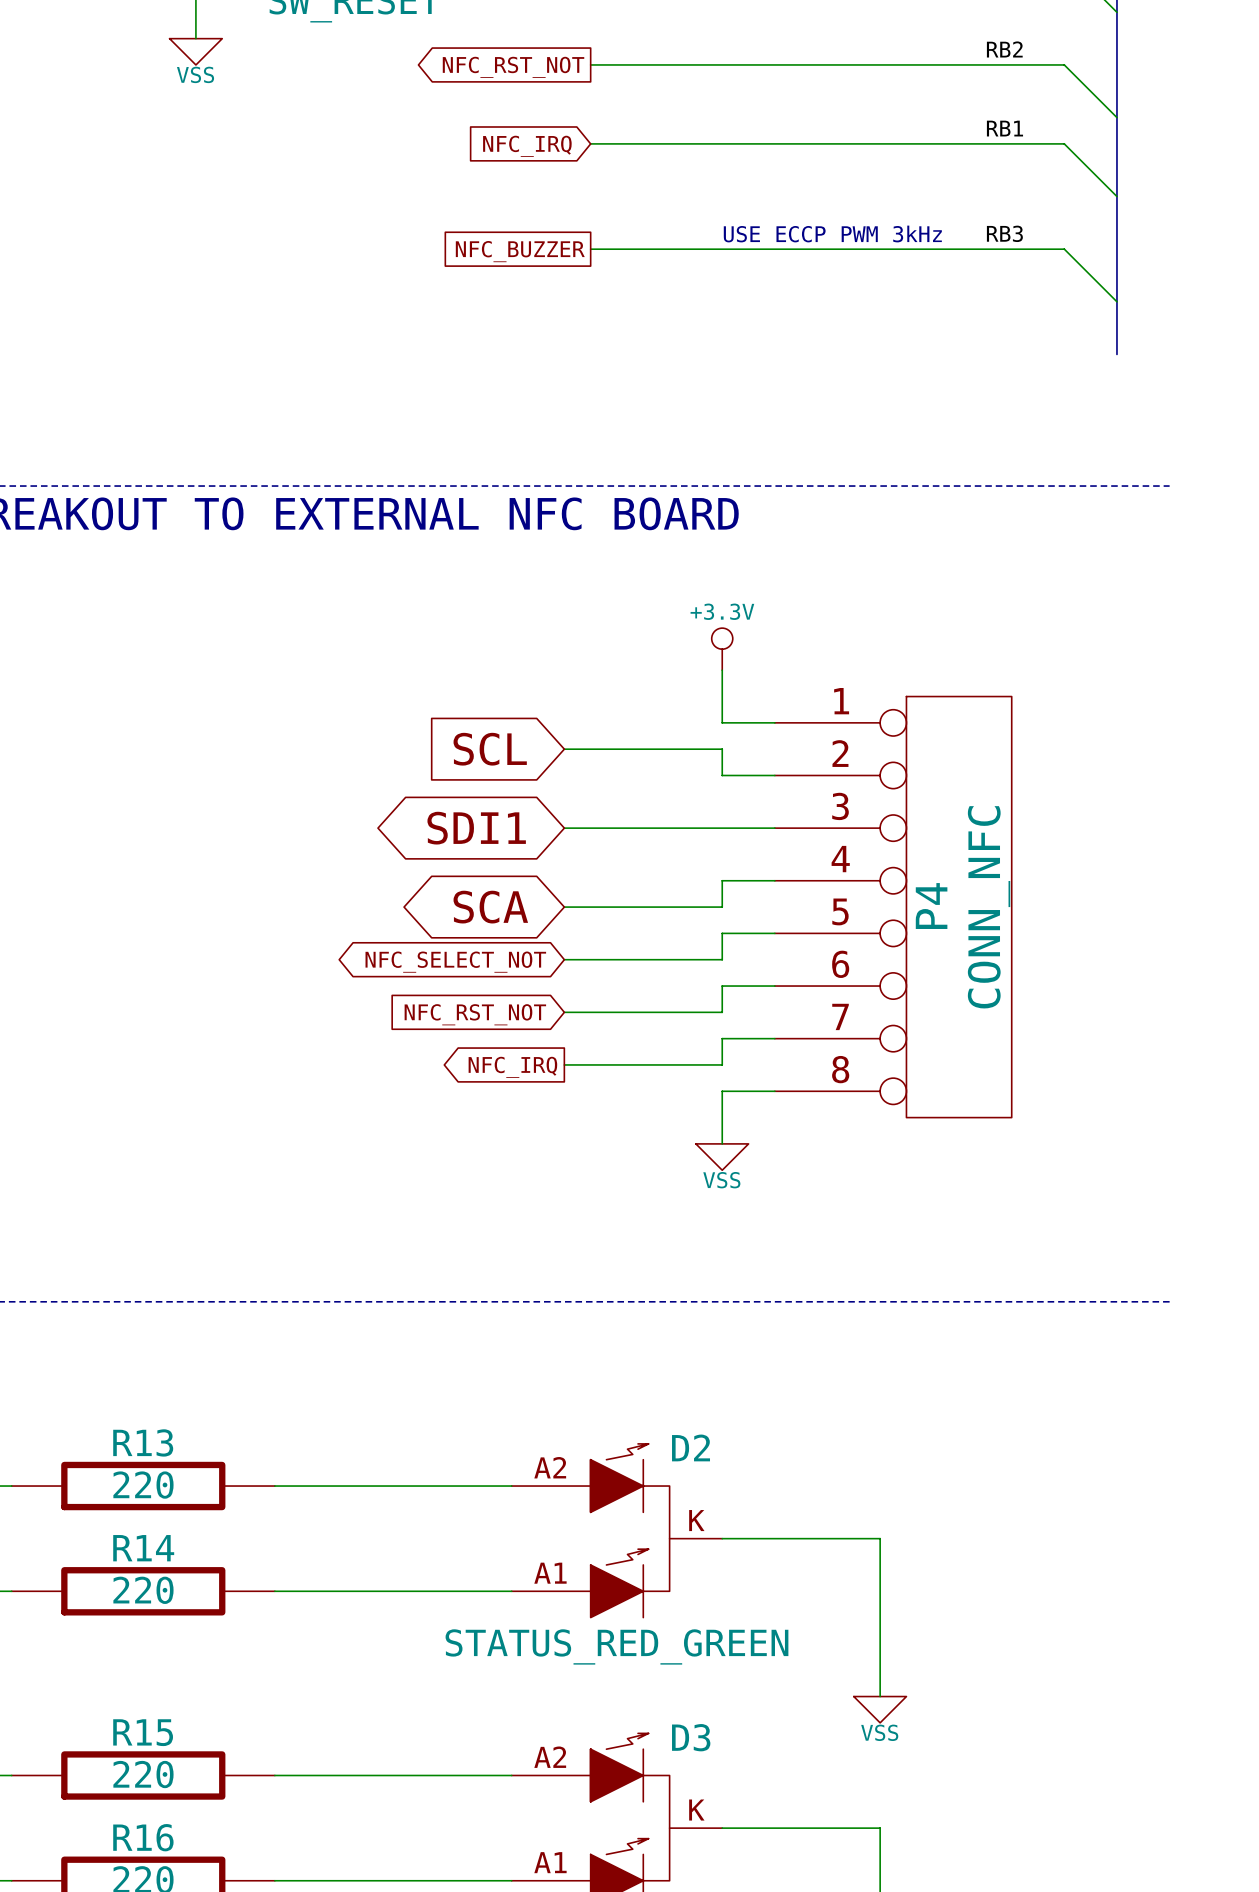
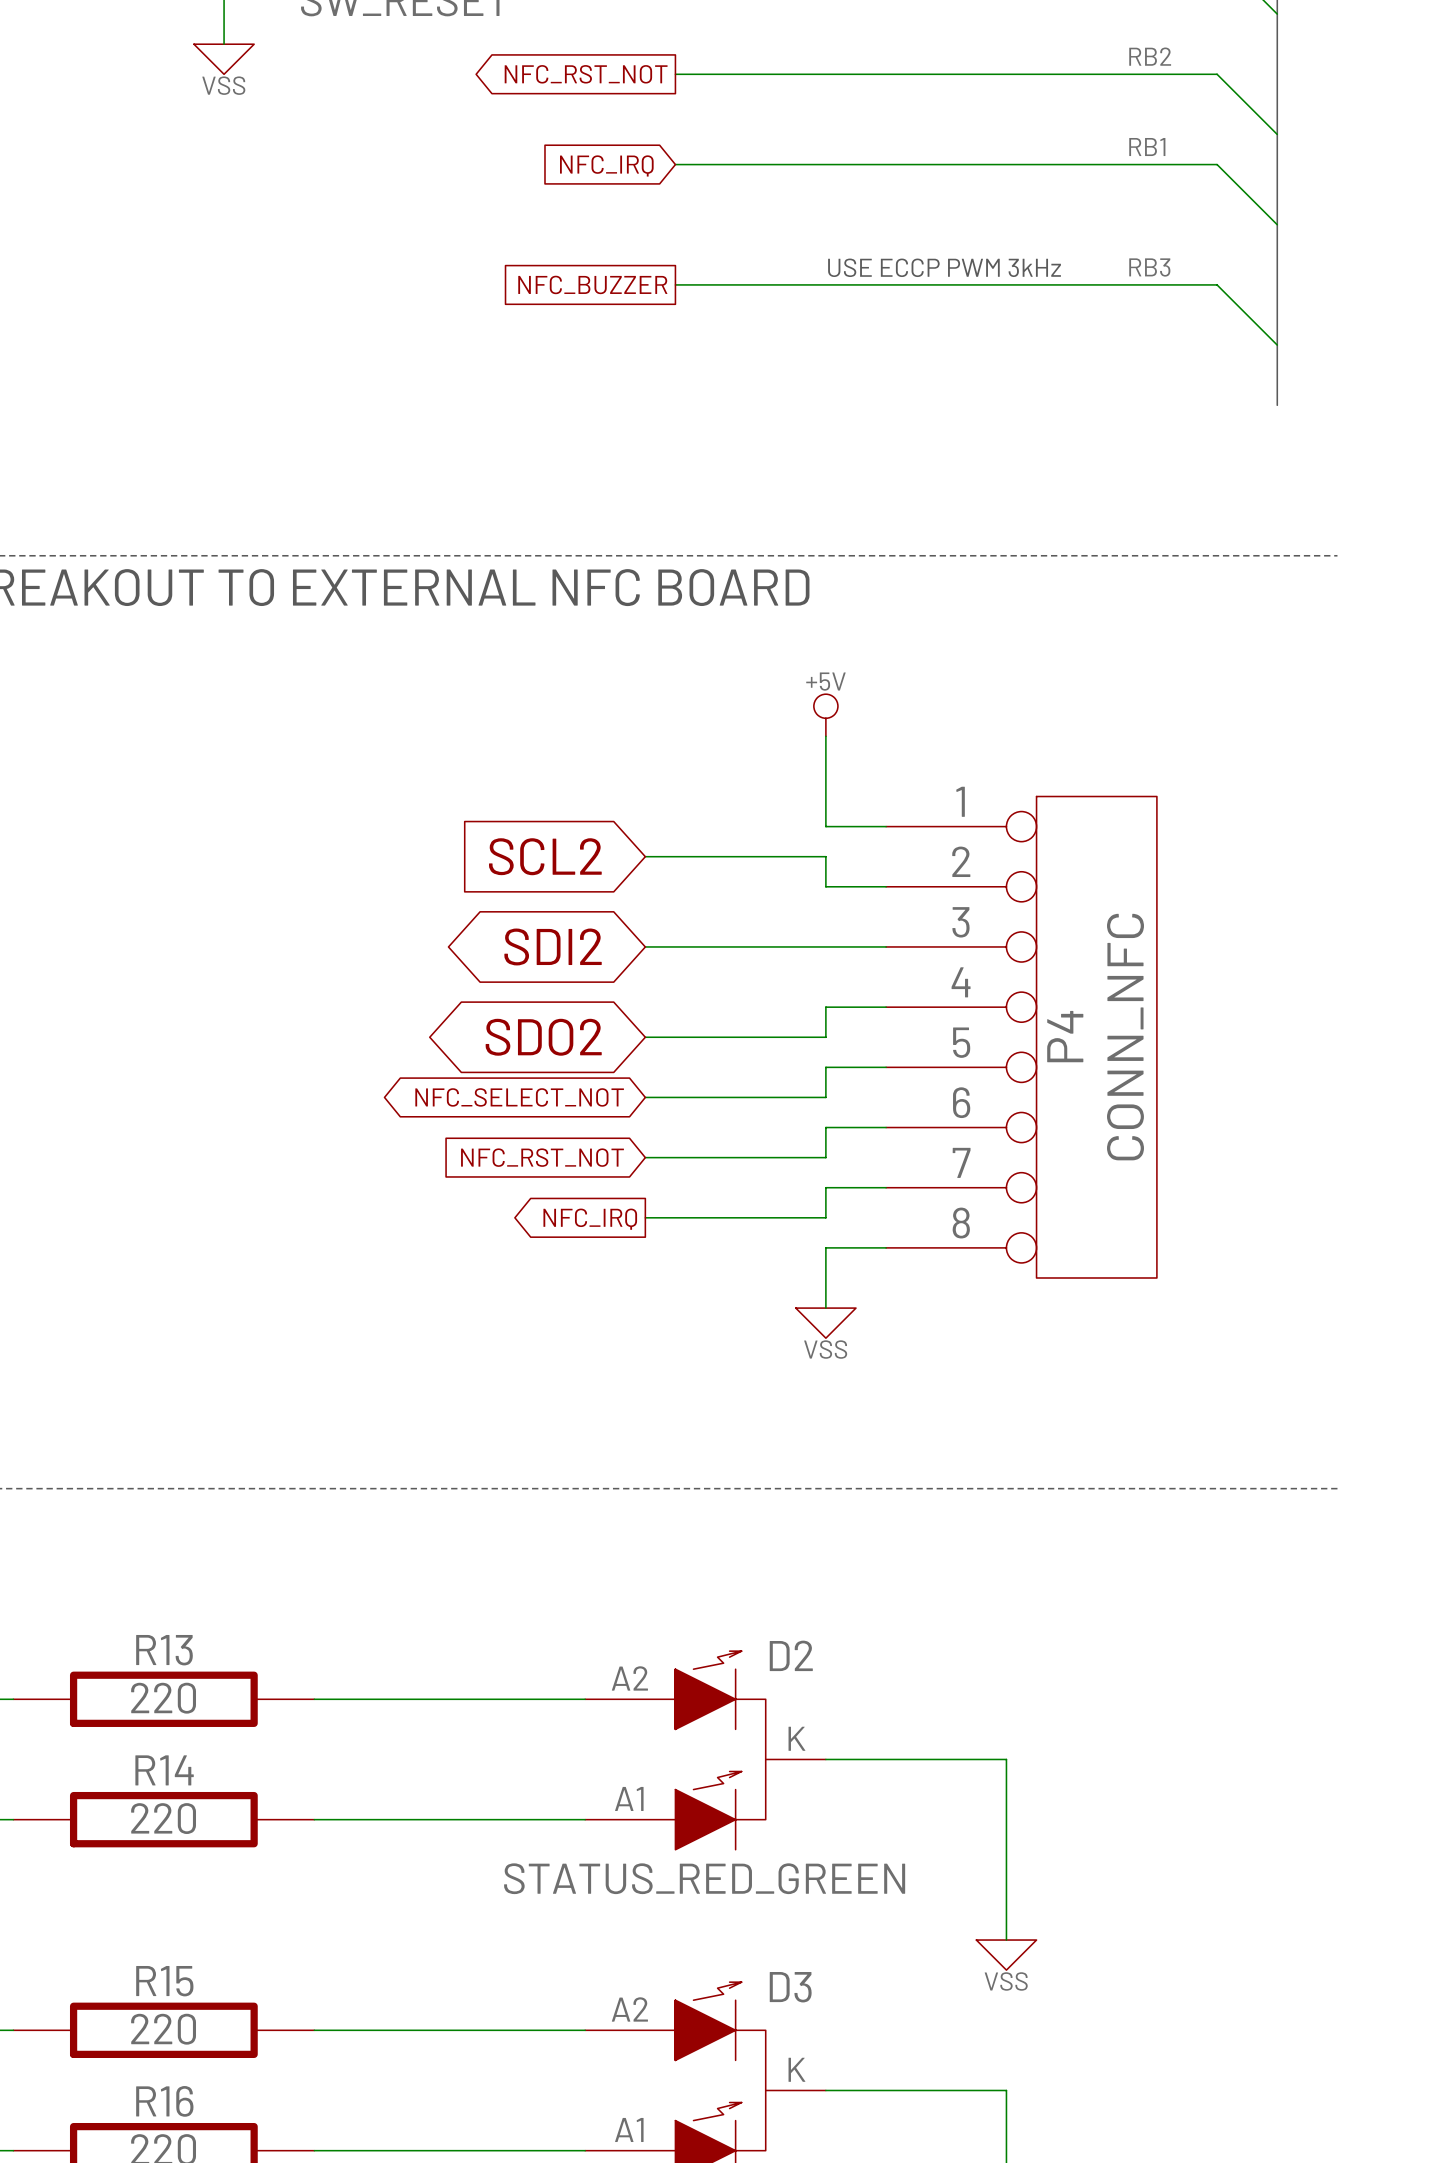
power symbol: none -> +5V (825, 715)
power symbol: +3.3V (722, 649) -> none
global label: SCL (490, 749) -> SCL2 (545, 856)
global label: SDI1 (476, 828) -> SDI2 (553, 946)
global label: SCA (490, 907) -> SDO2 (543, 1037)

